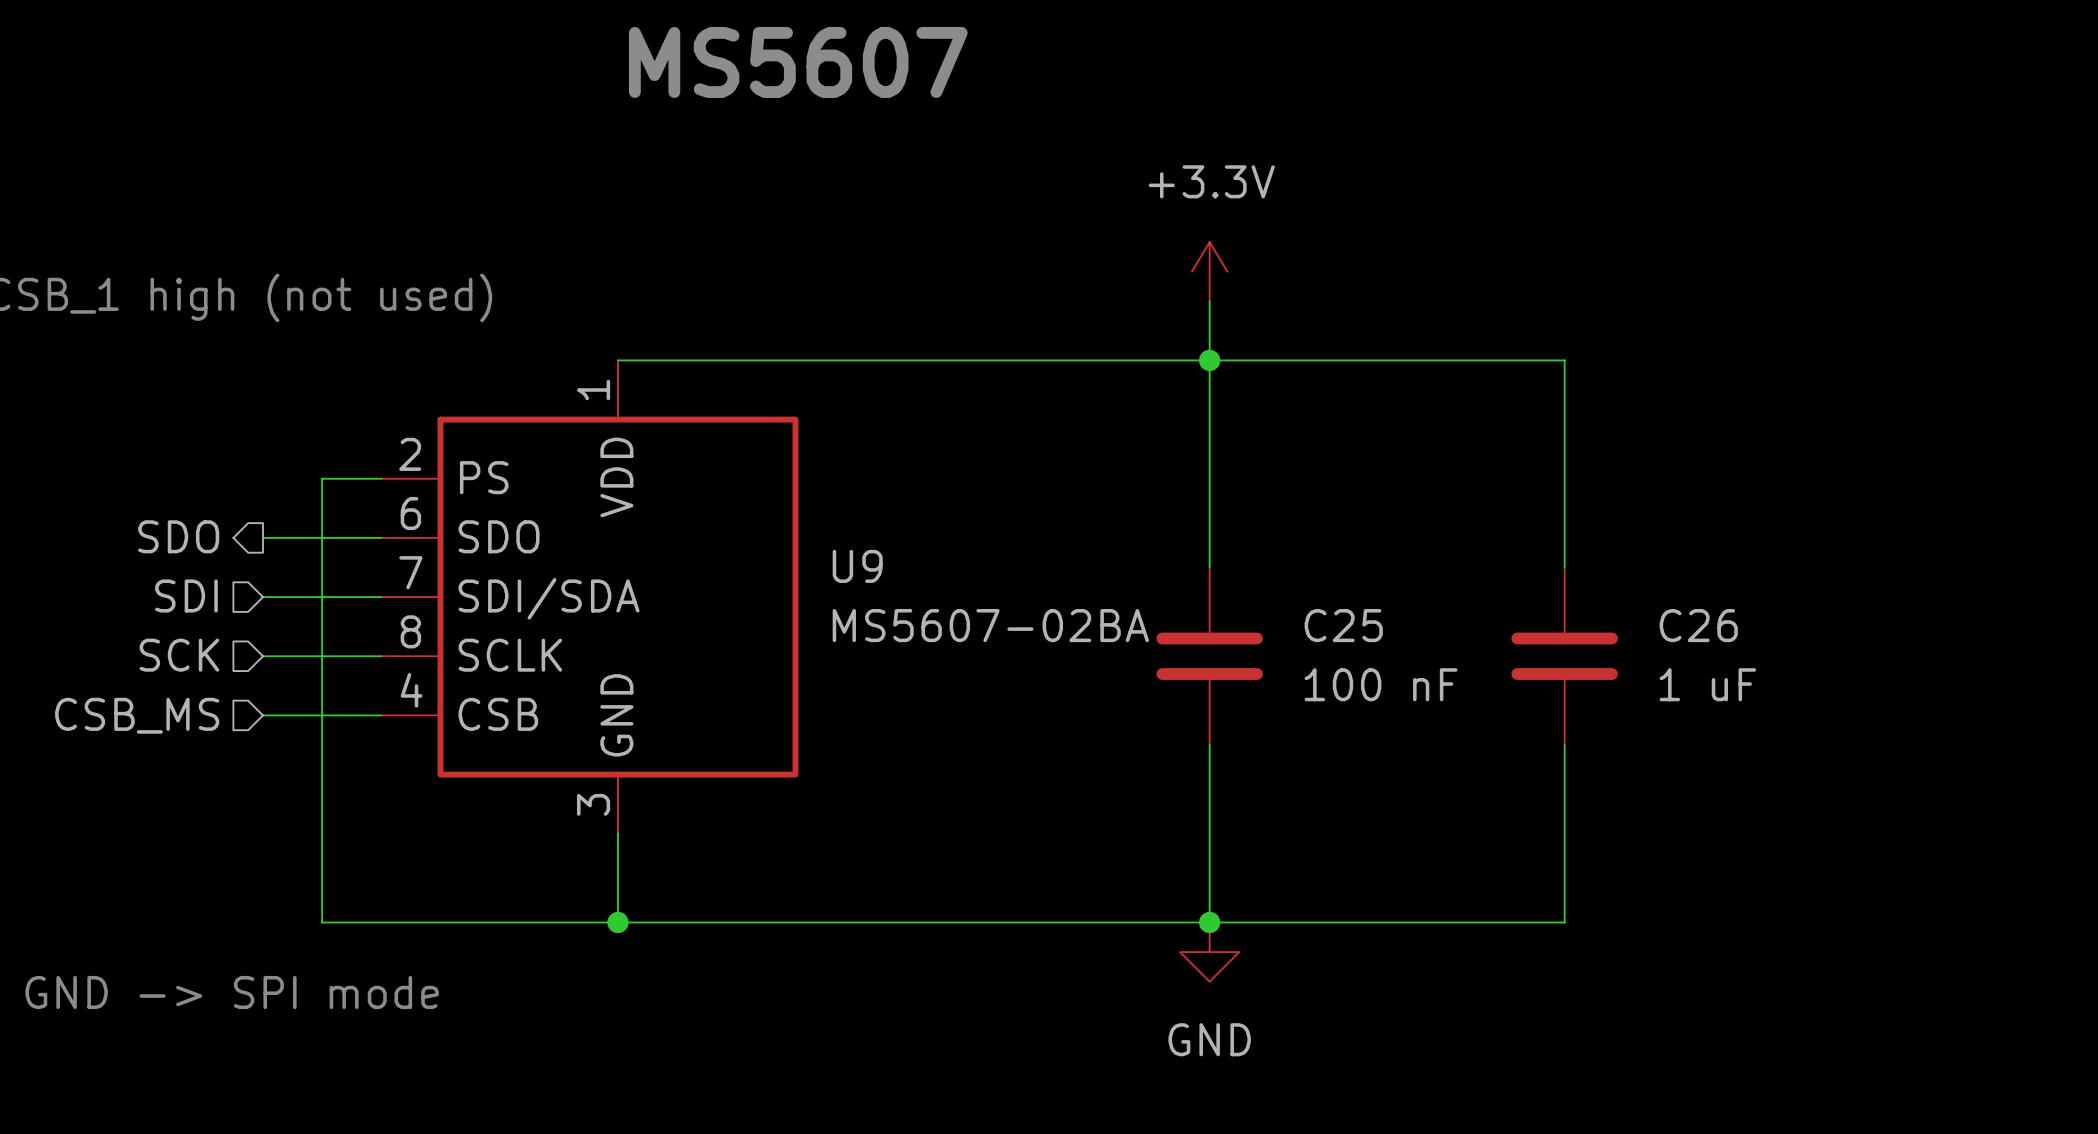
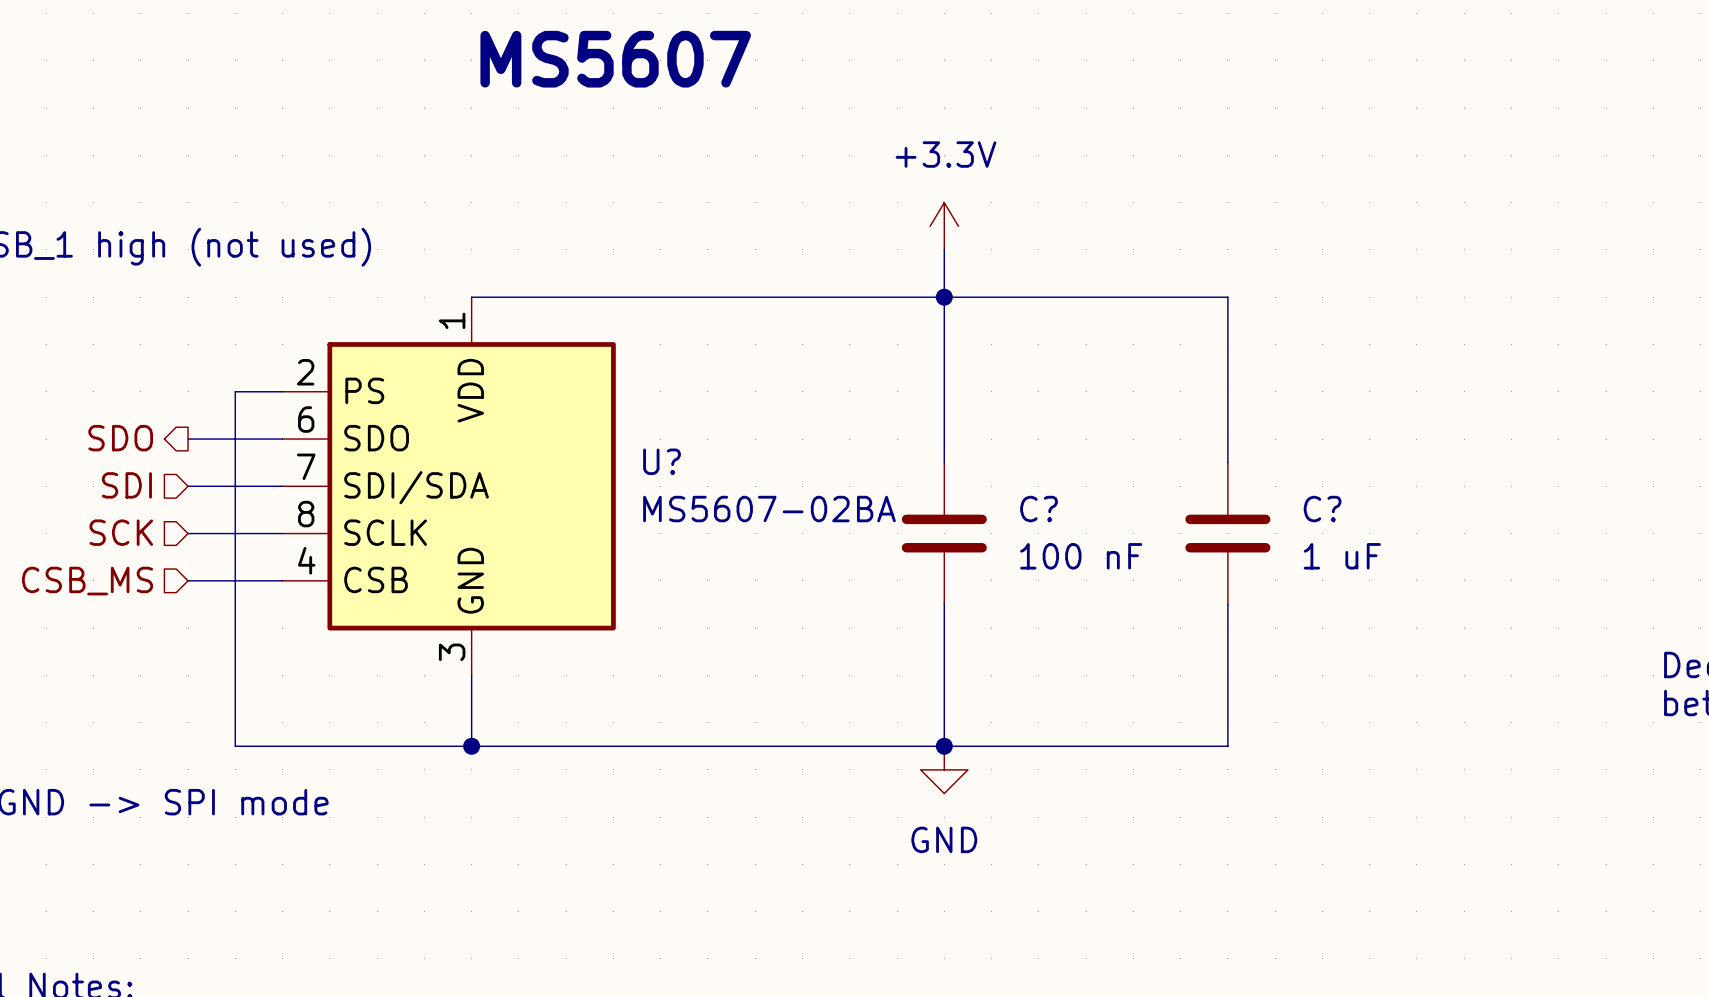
U9 name: U9 (857, 566) -> U? (662, 461)
C25 name: C25 (1343, 625) -> C? (1039, 509)
C26 name: C26 (1698, 625) -> C? (1322, 509)

